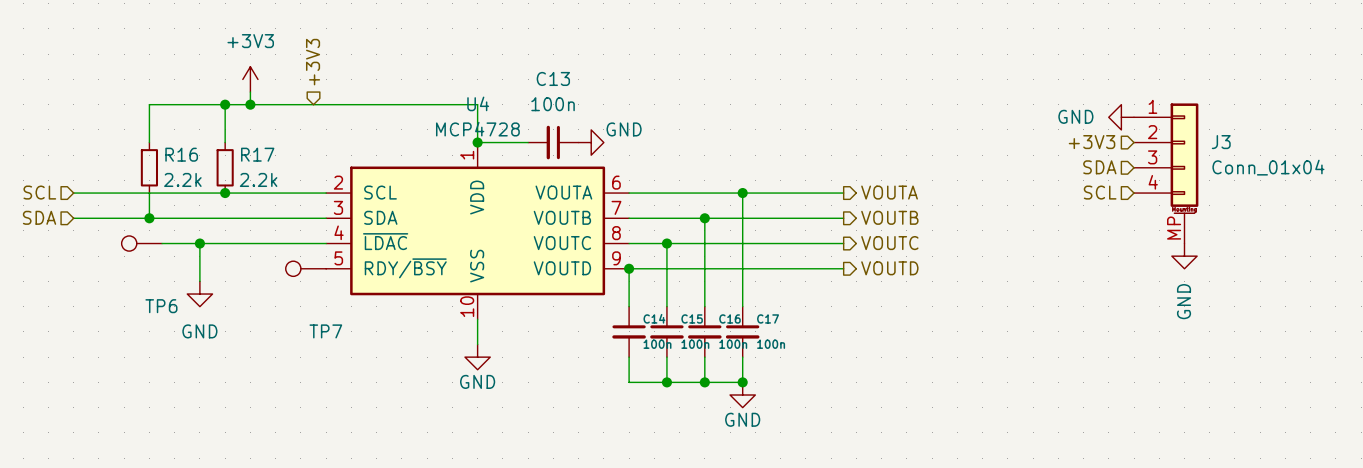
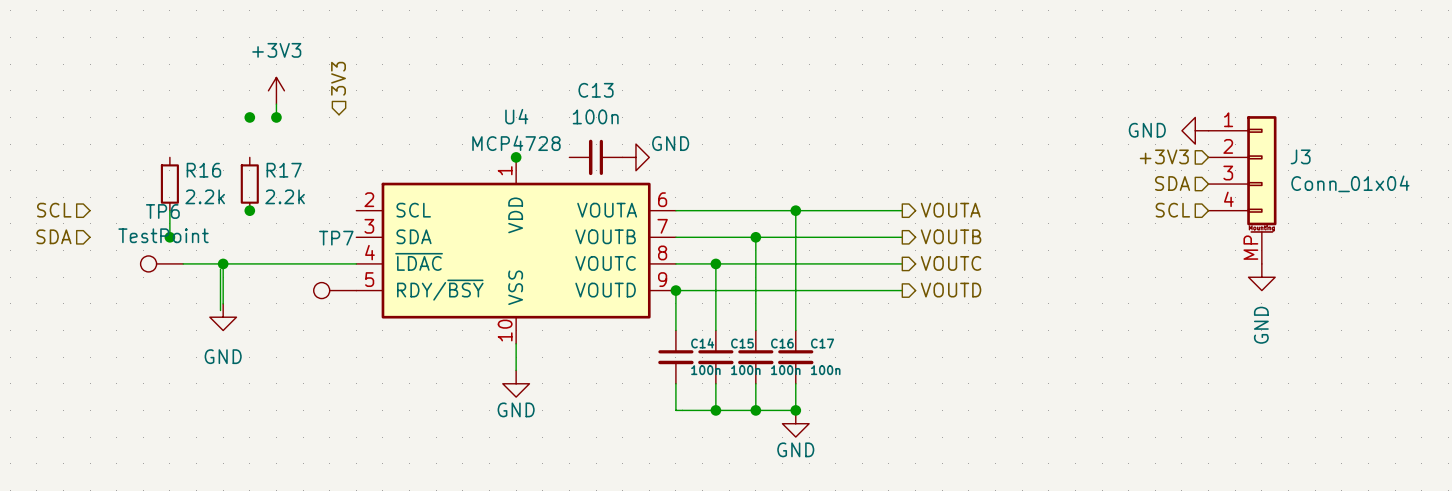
hierarchical label: +3V3 (313, 62) -> 3V3 (338, 78)
wire: (225, 104) (225, 142) -> none
wire: (149, 142) (149, 104) (477, 104) (477, 142) (528, 142) -> none
wire: (73, 193) (326, 193) -> none
TP6 value: none -> TestPoint (163, 235)
wire: (73, 218) (326, 218) -> none
wire: none -> (220, 269) (220, 310)
TP6 name position: TP6 (161, 306) -> TP6 (162, 211)
TP7 name position: TP7 (325, 331) -> TP7 (336, 238)

